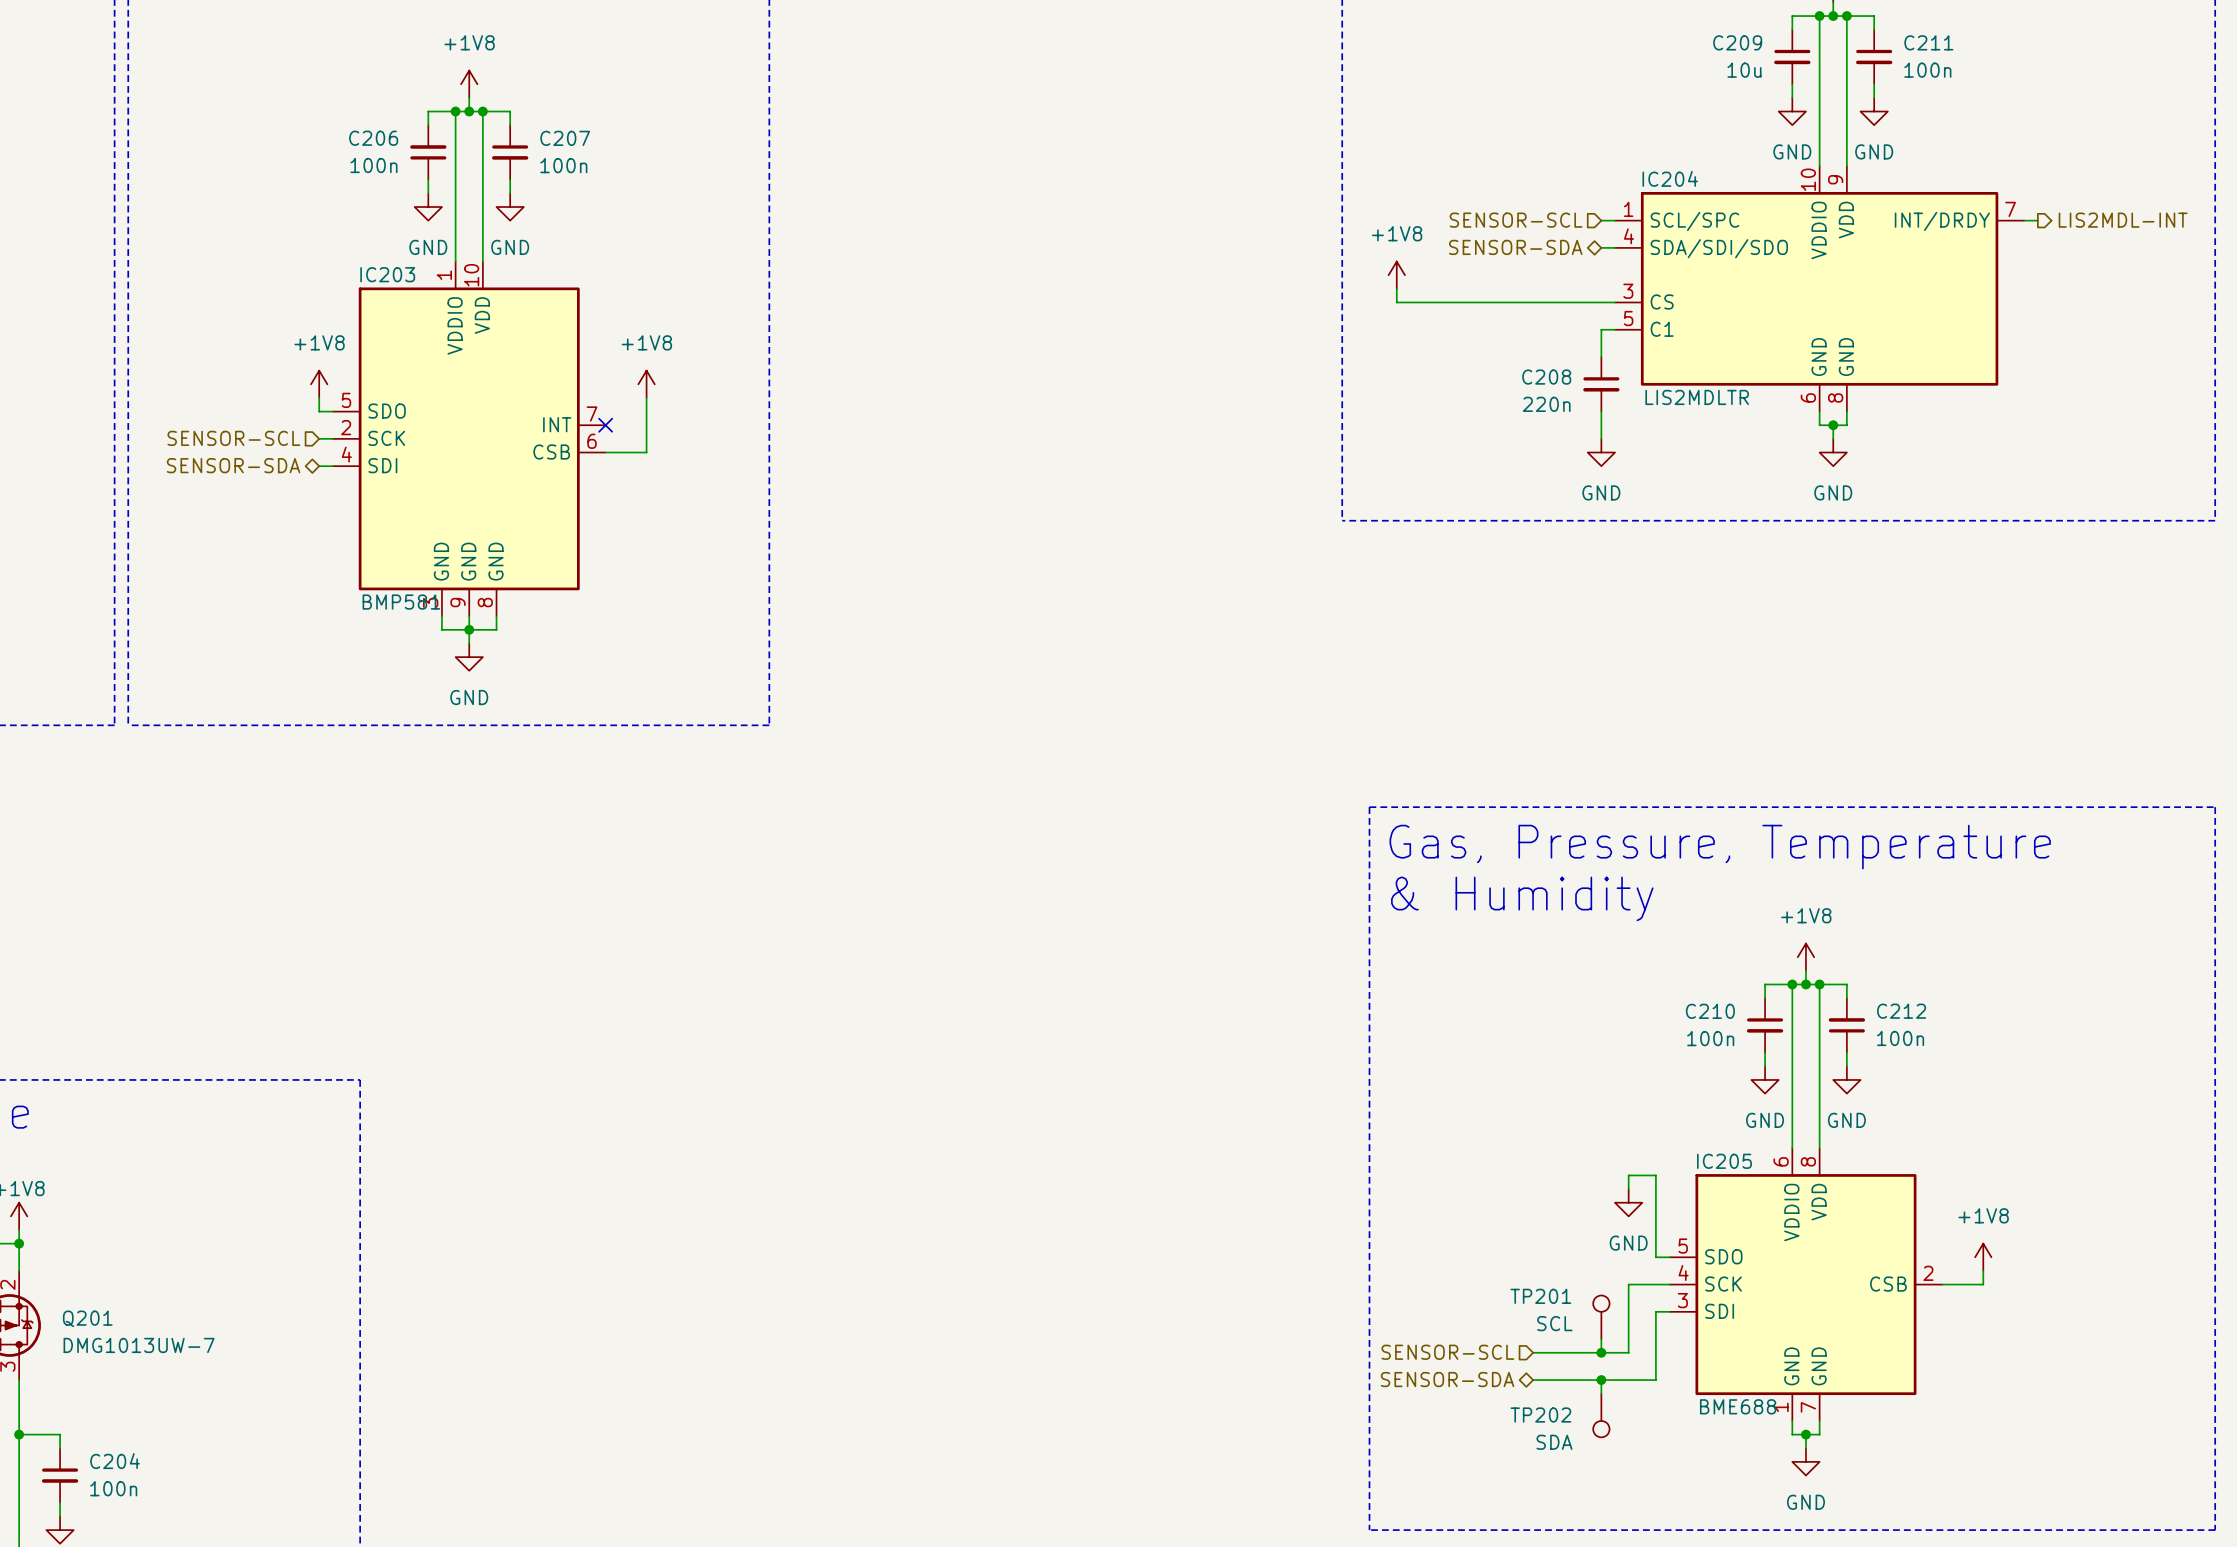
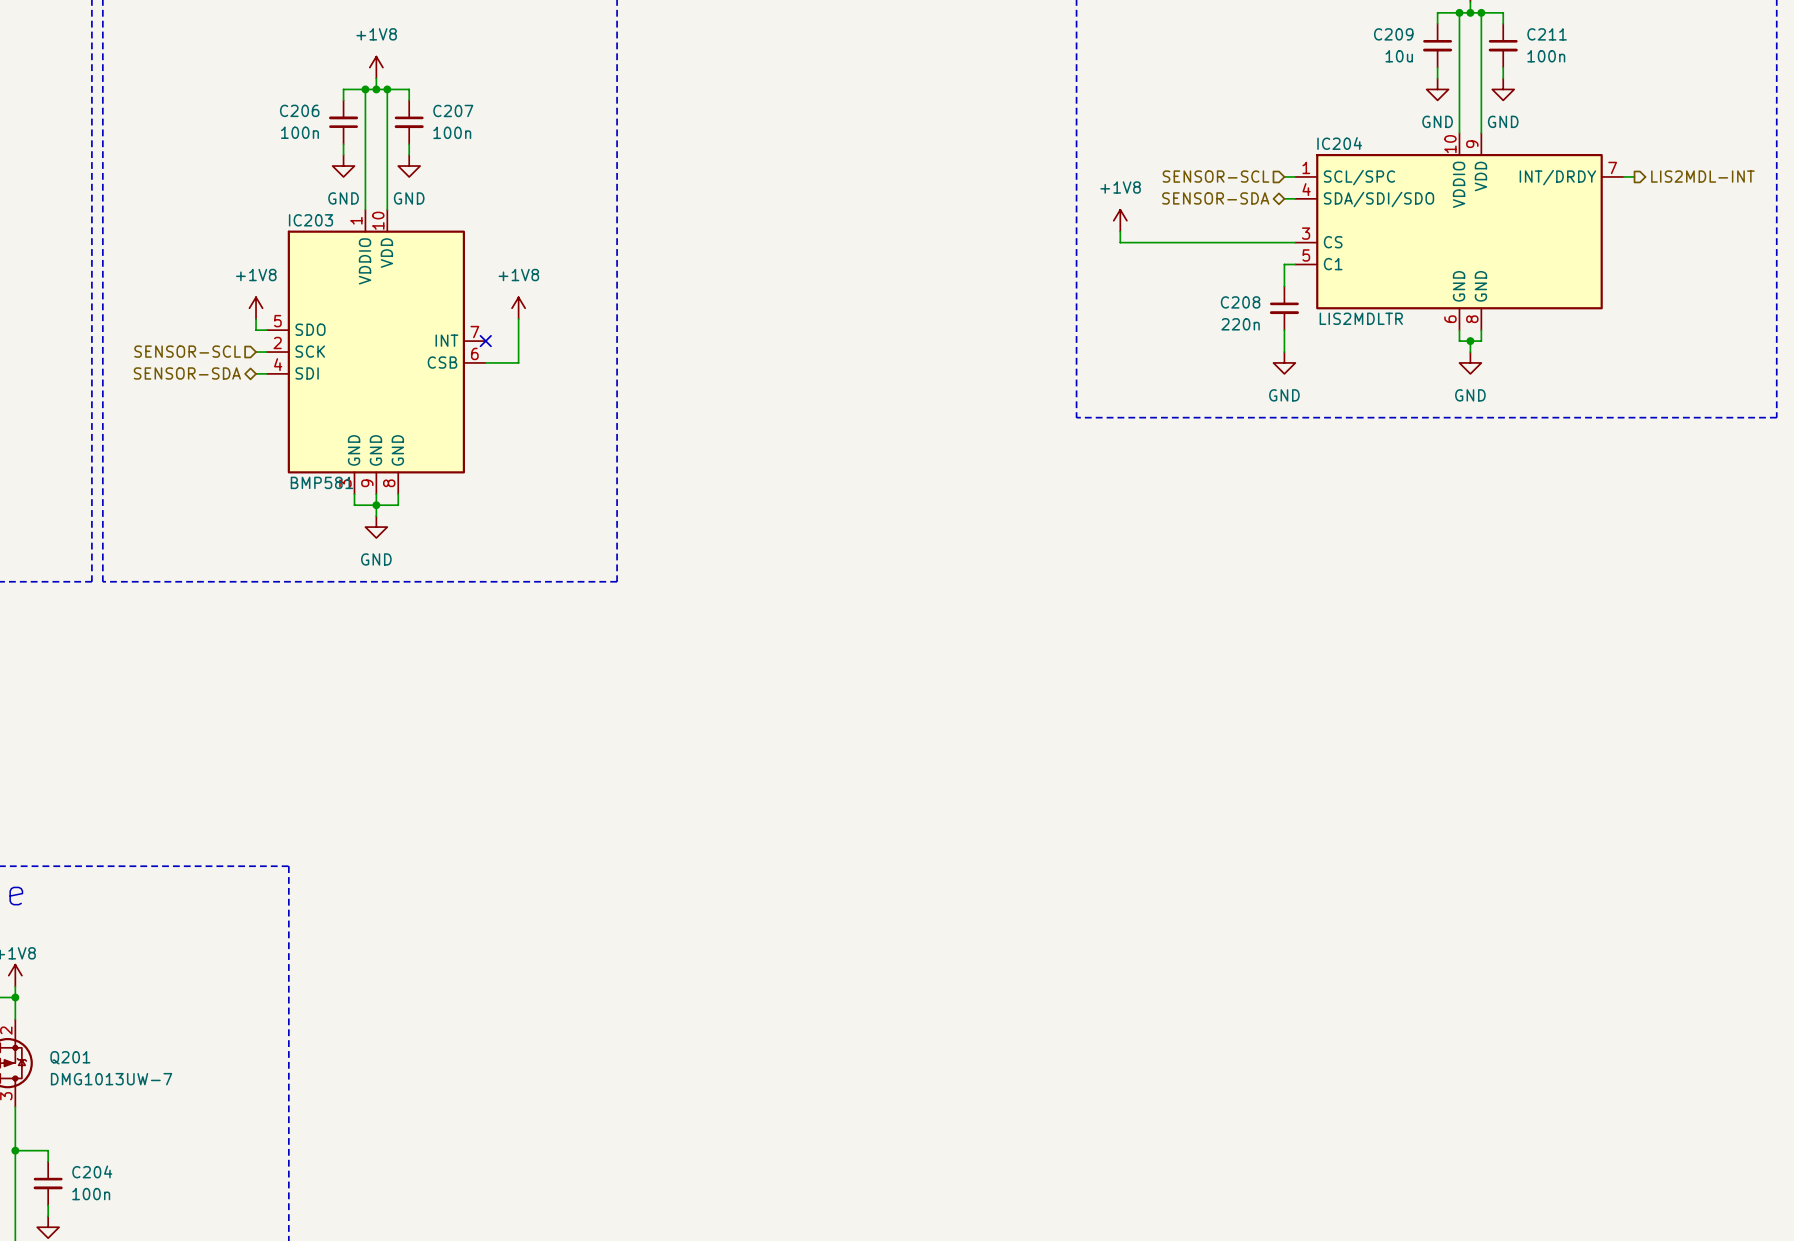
line: (1369, 807) (1369, 1530) (2215, 1530) (2215, 807) (1369, 807) -> none
text: Gas, Pressure, Temperature (1720, 847) -> none
text: & Humidity (1522, 898) -> none
power symbol: +1V8 (1805, 957) -> none
wire: (1805, 970) (1805, 984) -> none
wire: (1792, 984) (1792, 1148) -> none
junction: (1792, 984) -> none
junction: (1805, 984) -> none
wire: (1819, 984) (1819, 1148) -> none
junction: (1819, 984) -> none
wire: (1765, 998) (1765, 984) (1846, 984) (1846, 998) -> none
C210: 100n (1765, 1025) -> none
C212: 100n (1846, 1025) -> none
wire: (1765, 1052) (1765, 1066) -> none
wire: (1846, 1052) (1846, 1066) -> none
power symbol: GND (1765, 1079) -> none
power symbol: GND (1846, 1079) -> none
wire: (1628, 1189) (1628, 1175) (1655, 1175) (1655, 1257) (1669, 1257) -> none
power symbol: GND (1628, 1202) -> none
power symbol: +1V8 (1983, 1257) -> none
wire: (1983, 1270) (1983, 1284) (1942, 1284) -> none
wire: (1669, 1284) (1628, 1284) (1628, 1352) (1533, 1352) -> none
IC205: BME688 (1805, 1284) -> none
wire: (1669, 1311) (1655, 1311) (1655, 1380) (1533, 1380) -> none
TP201: SCL (1601, 1317) -> none
wire: (1601, 1339) (1601, 1352) -> none
hierarchical label: SENSOR-SCL (1447, 1352) -> none
junction: (1601, 1352) -> none
hierarchical label: SENSOR-SDA (1447, 1379) -> none
wire: (1601, 1380) (1601, 1393) -> none
junction: (1601, 1380) -> none
TP202: SDA (1601, 1415) -> none
wire: (1792, 1420) (1792, 1434) (1819, 1434) (1819, 1420) -> none
wire: (1805, 1434) (1805, 1448) -> none
junction: (1805, 1434) -> none
power symbol: GND (1805, 1461) -> none

